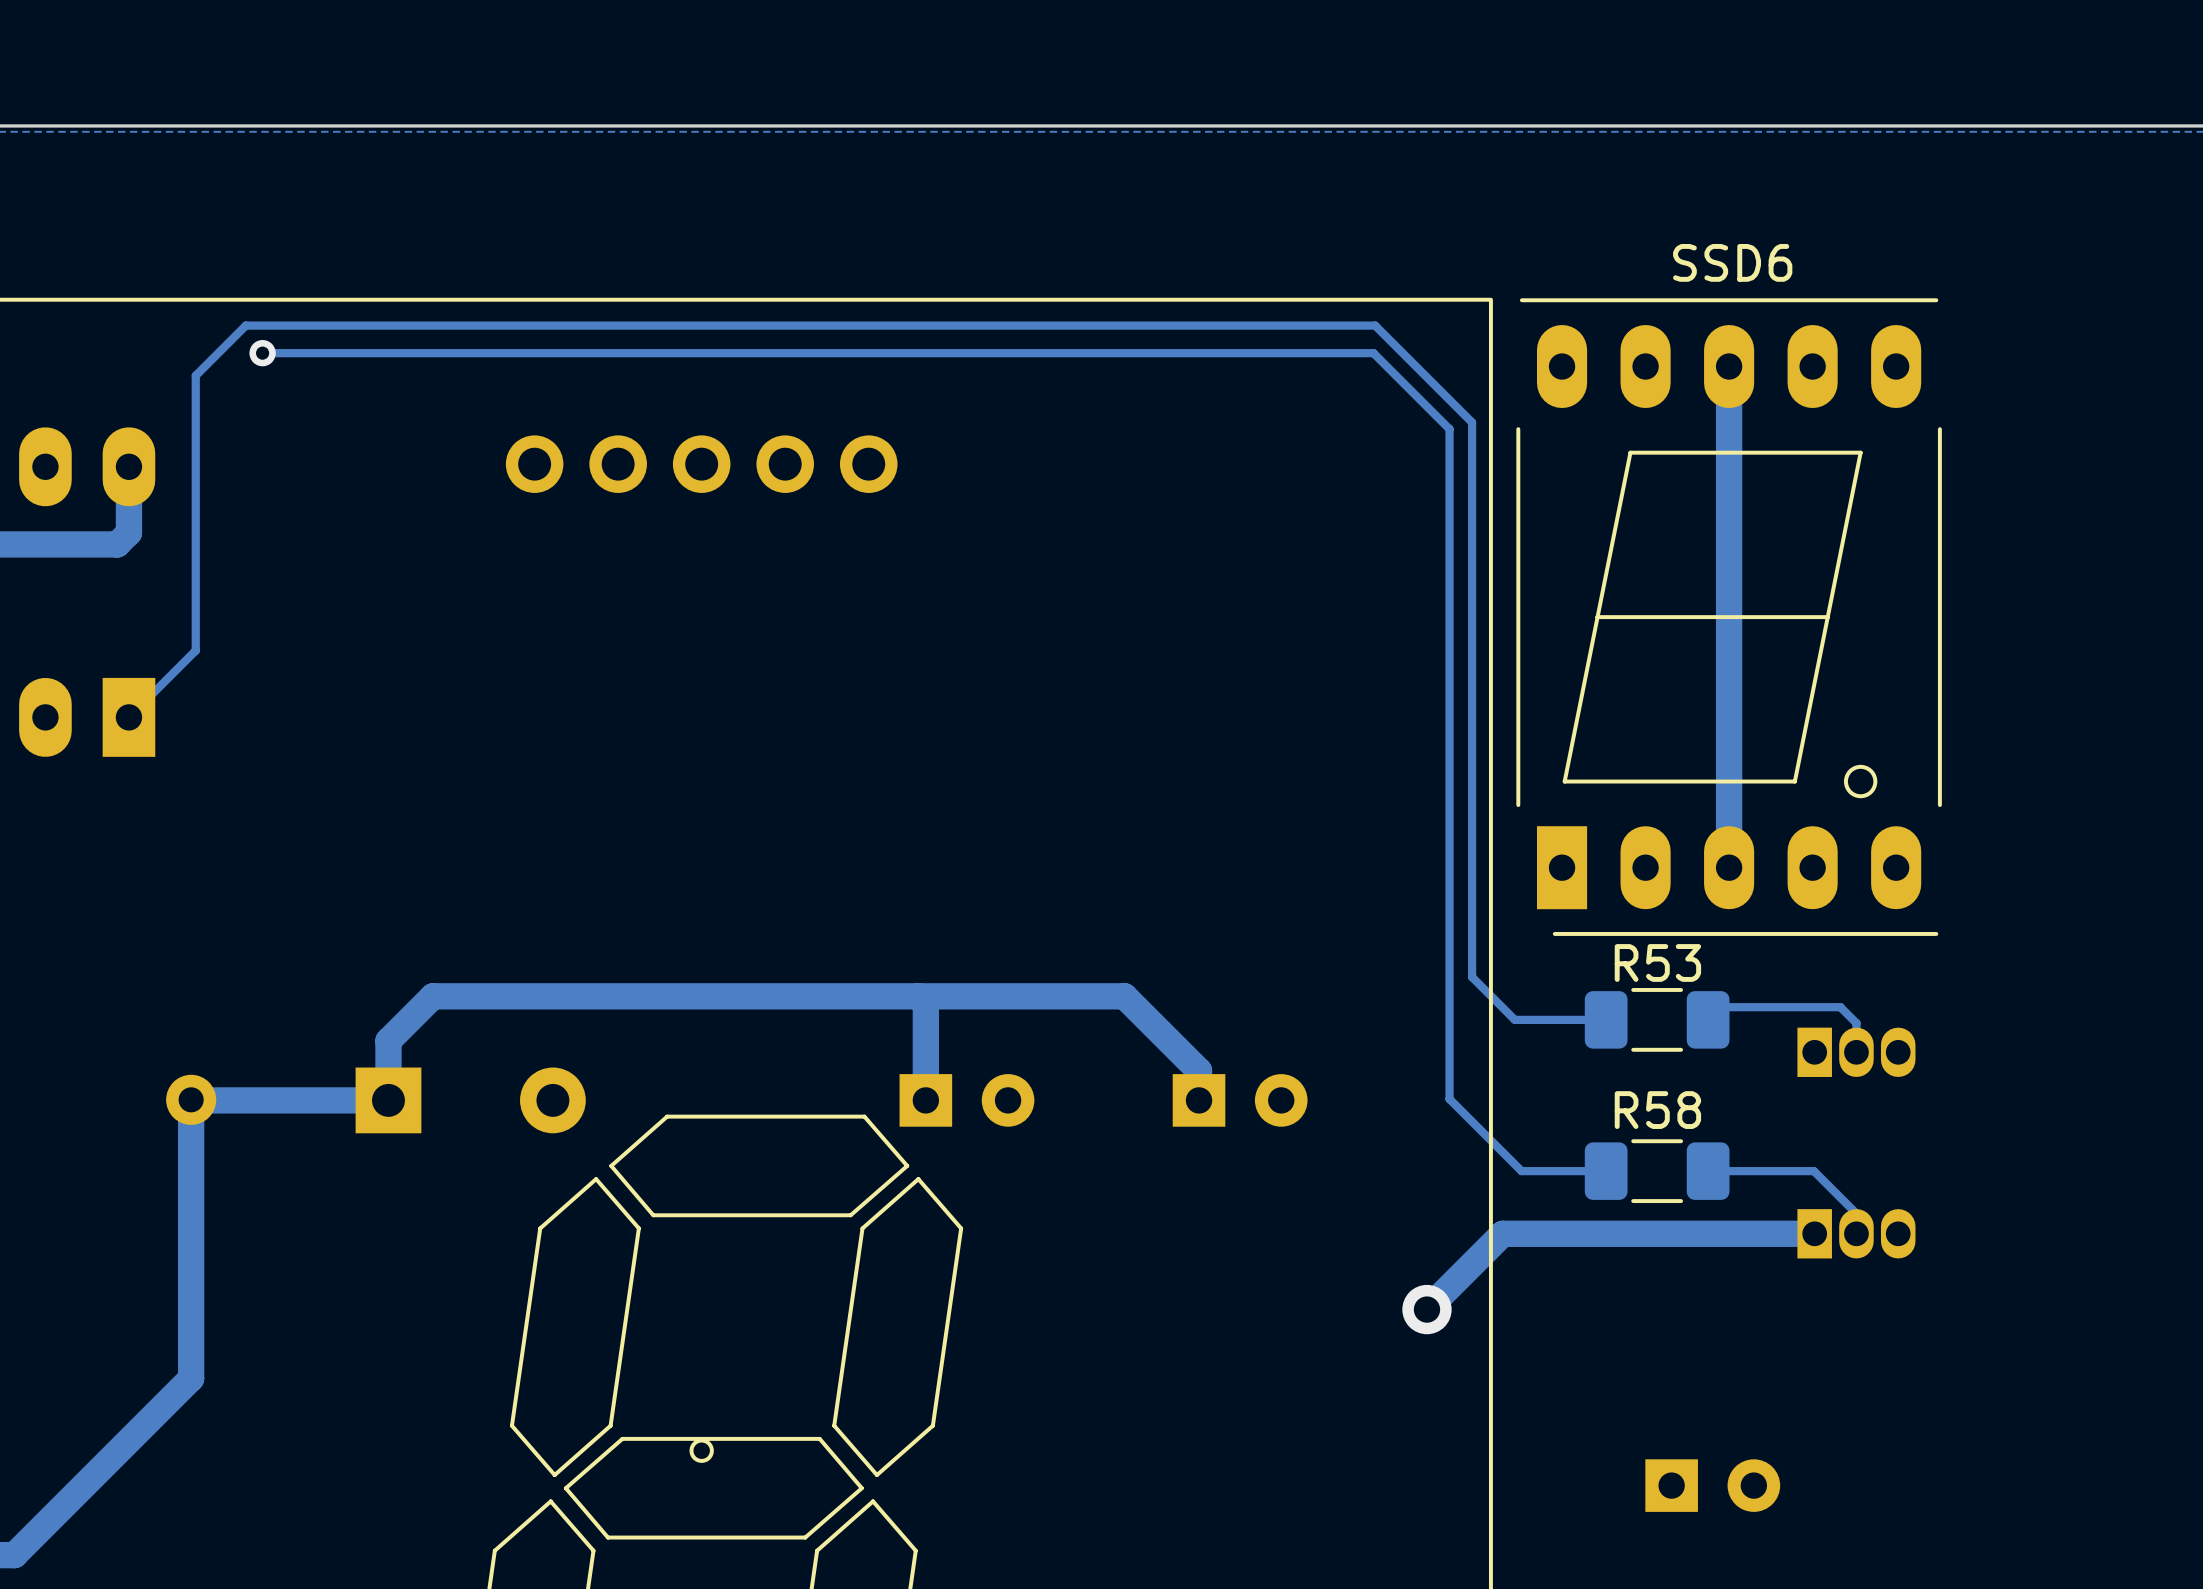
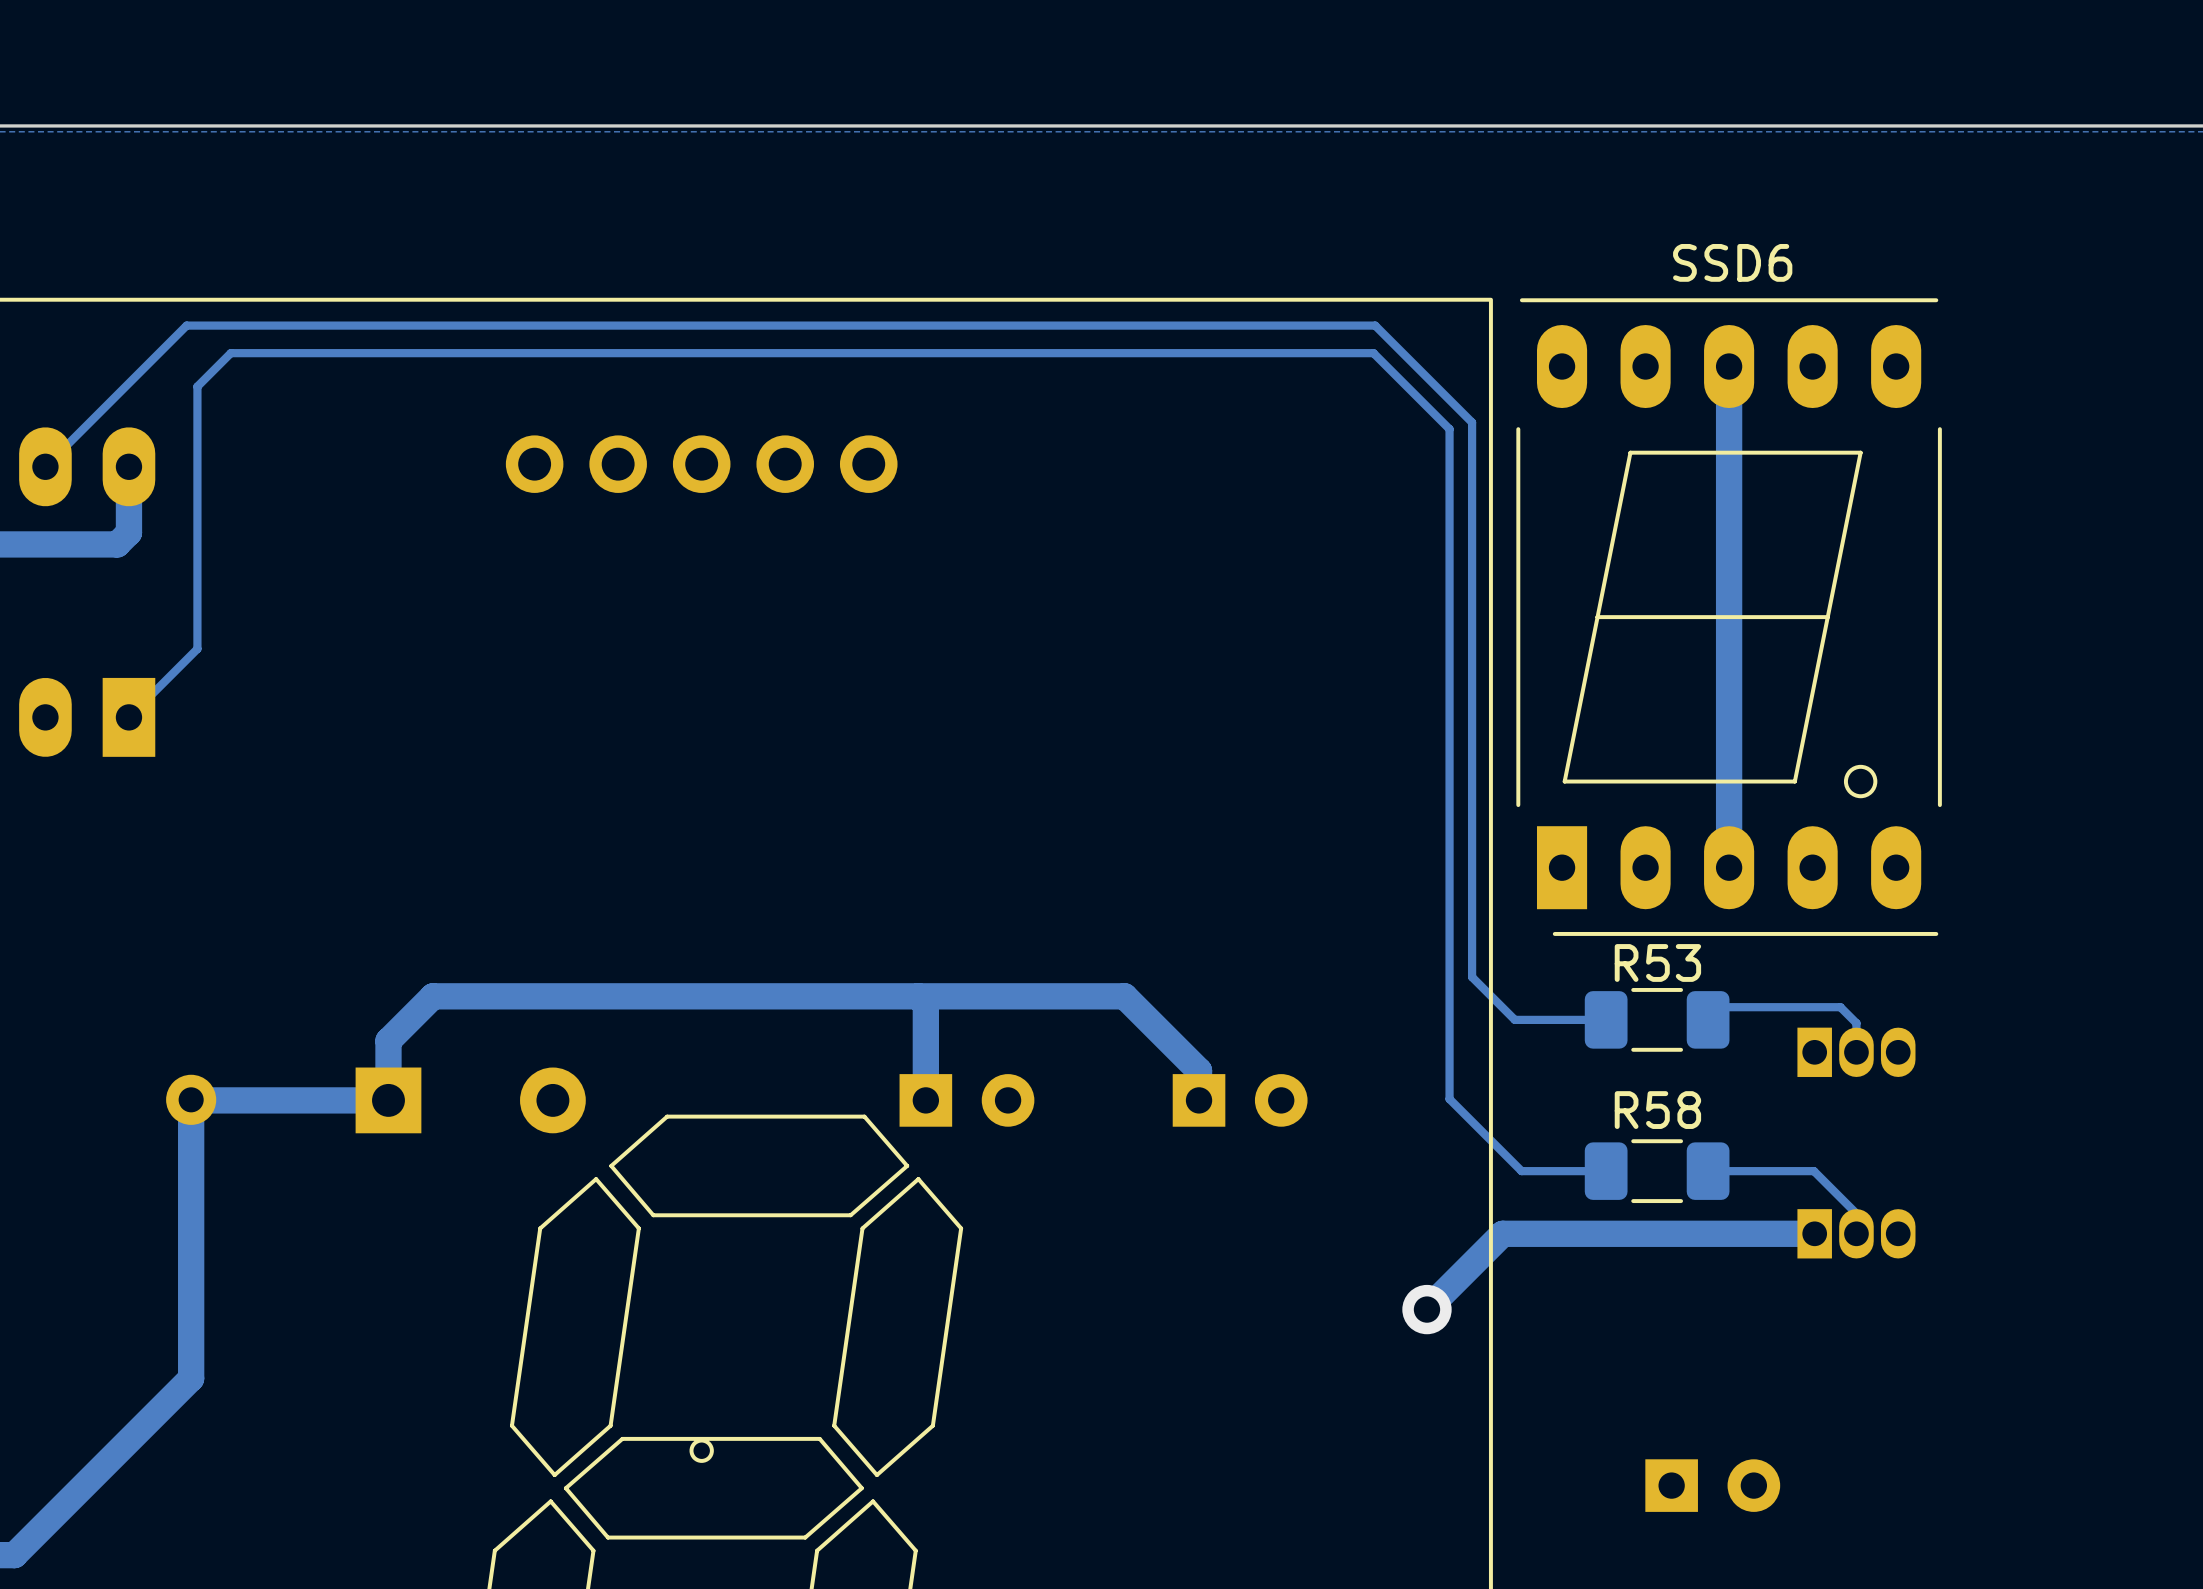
track: (245, 325) (195, 375) (195, 650) -> (262, 353) (230, 353) (197, 386) (197, 648) (195, 650)
track: none -> (245, 325) (186, 325) (45, 466)
via: (262, 353) -> none

